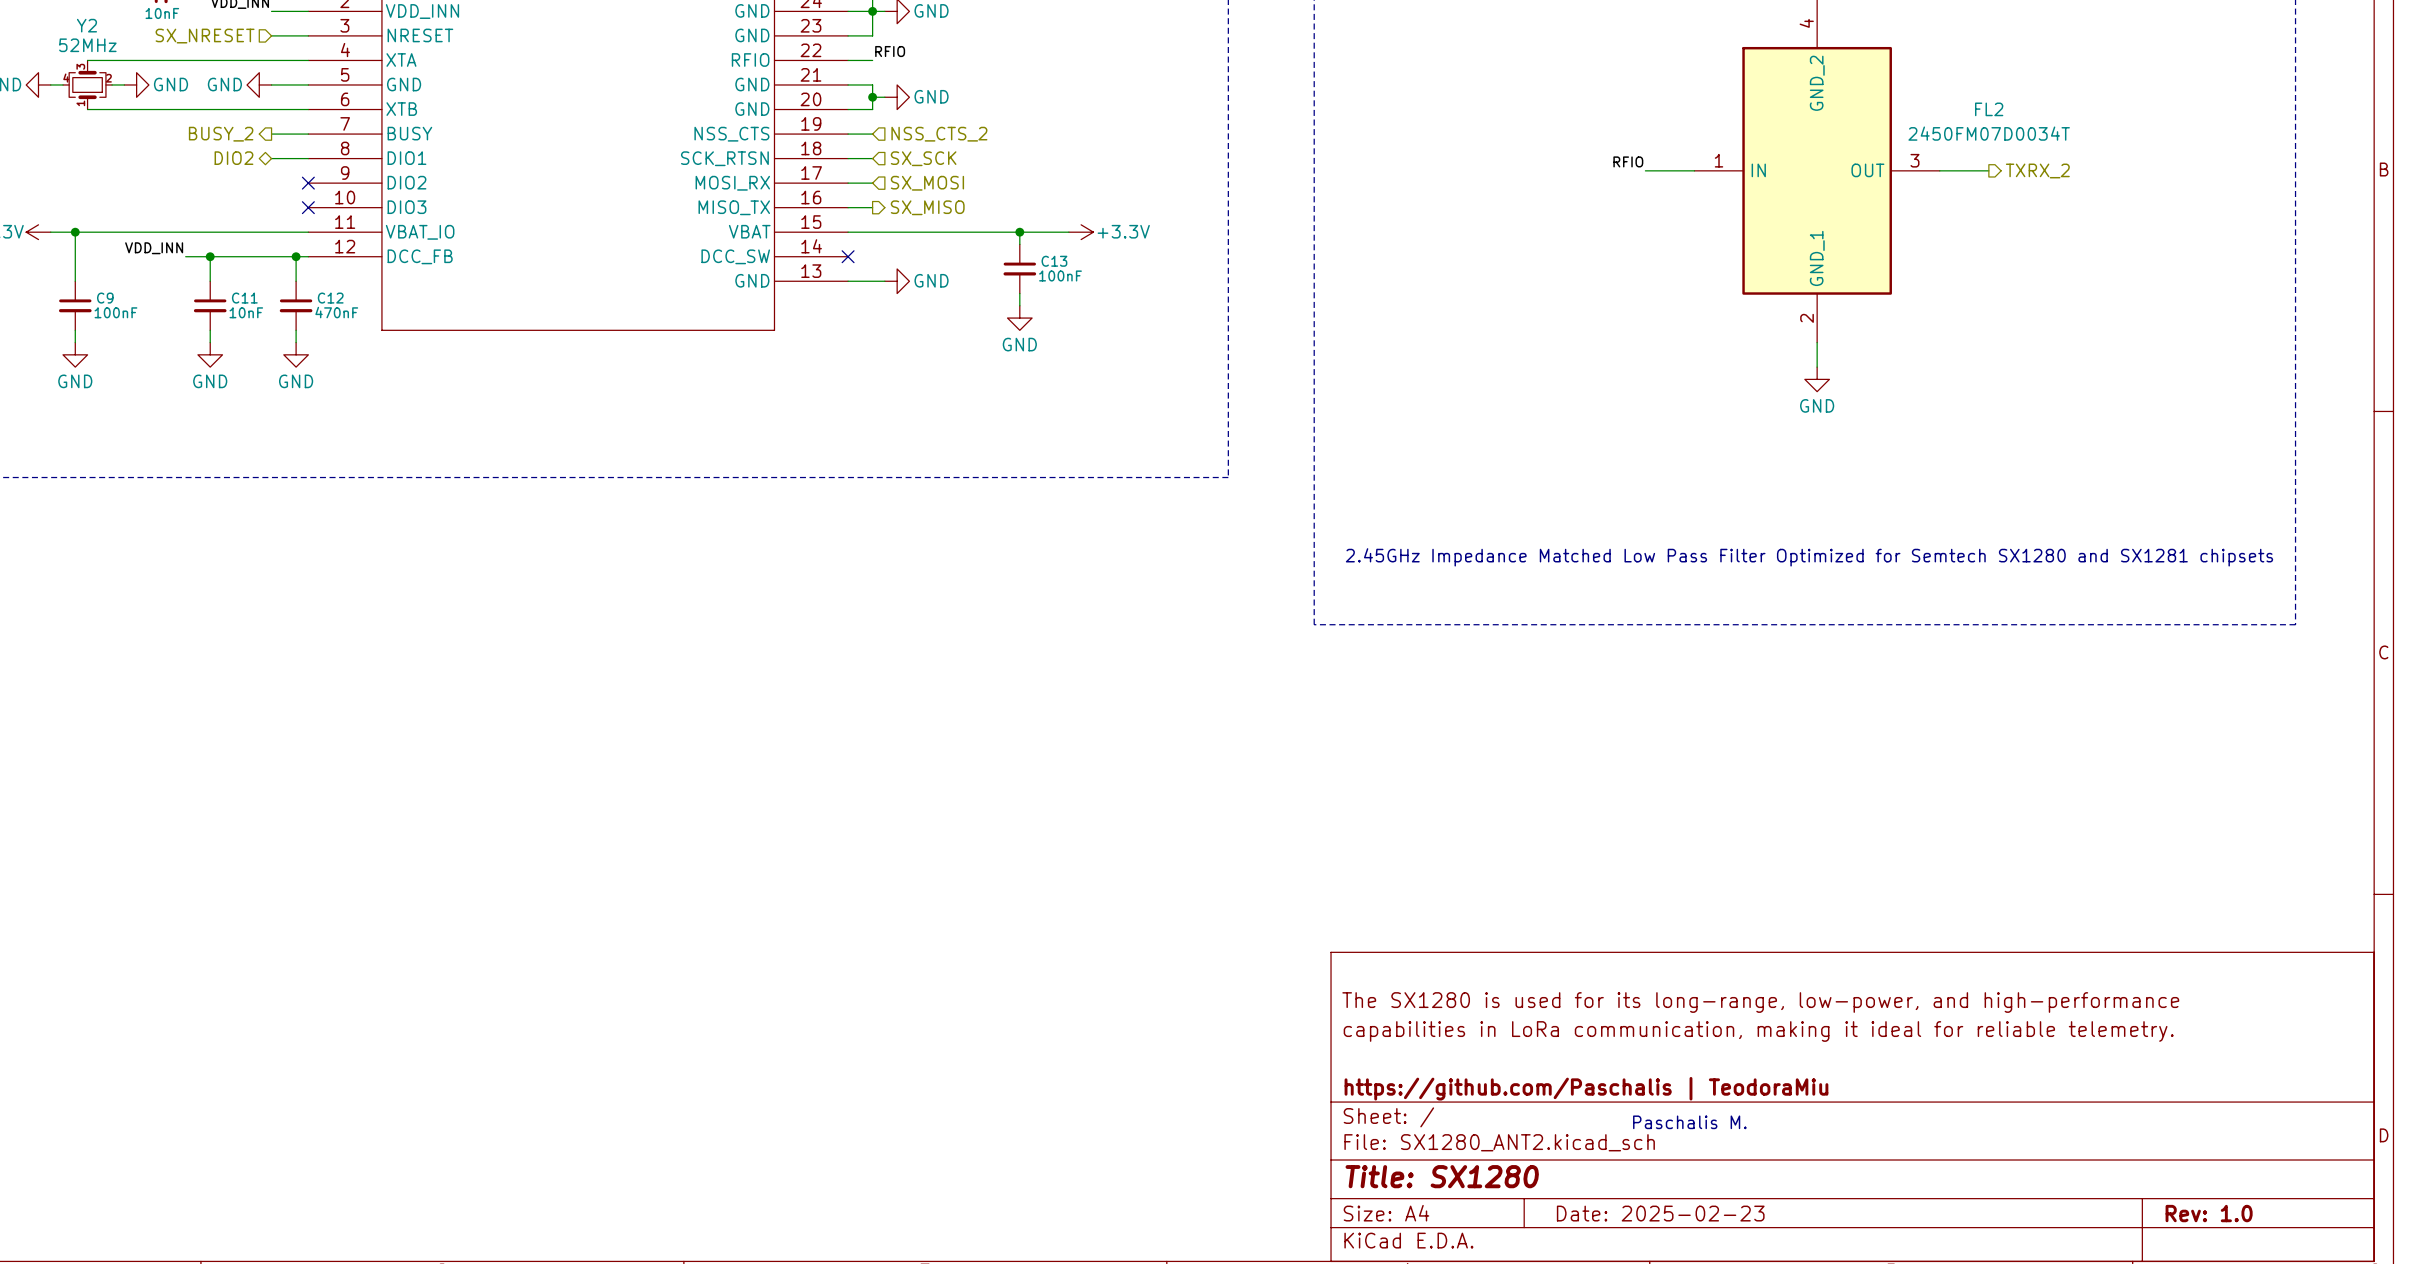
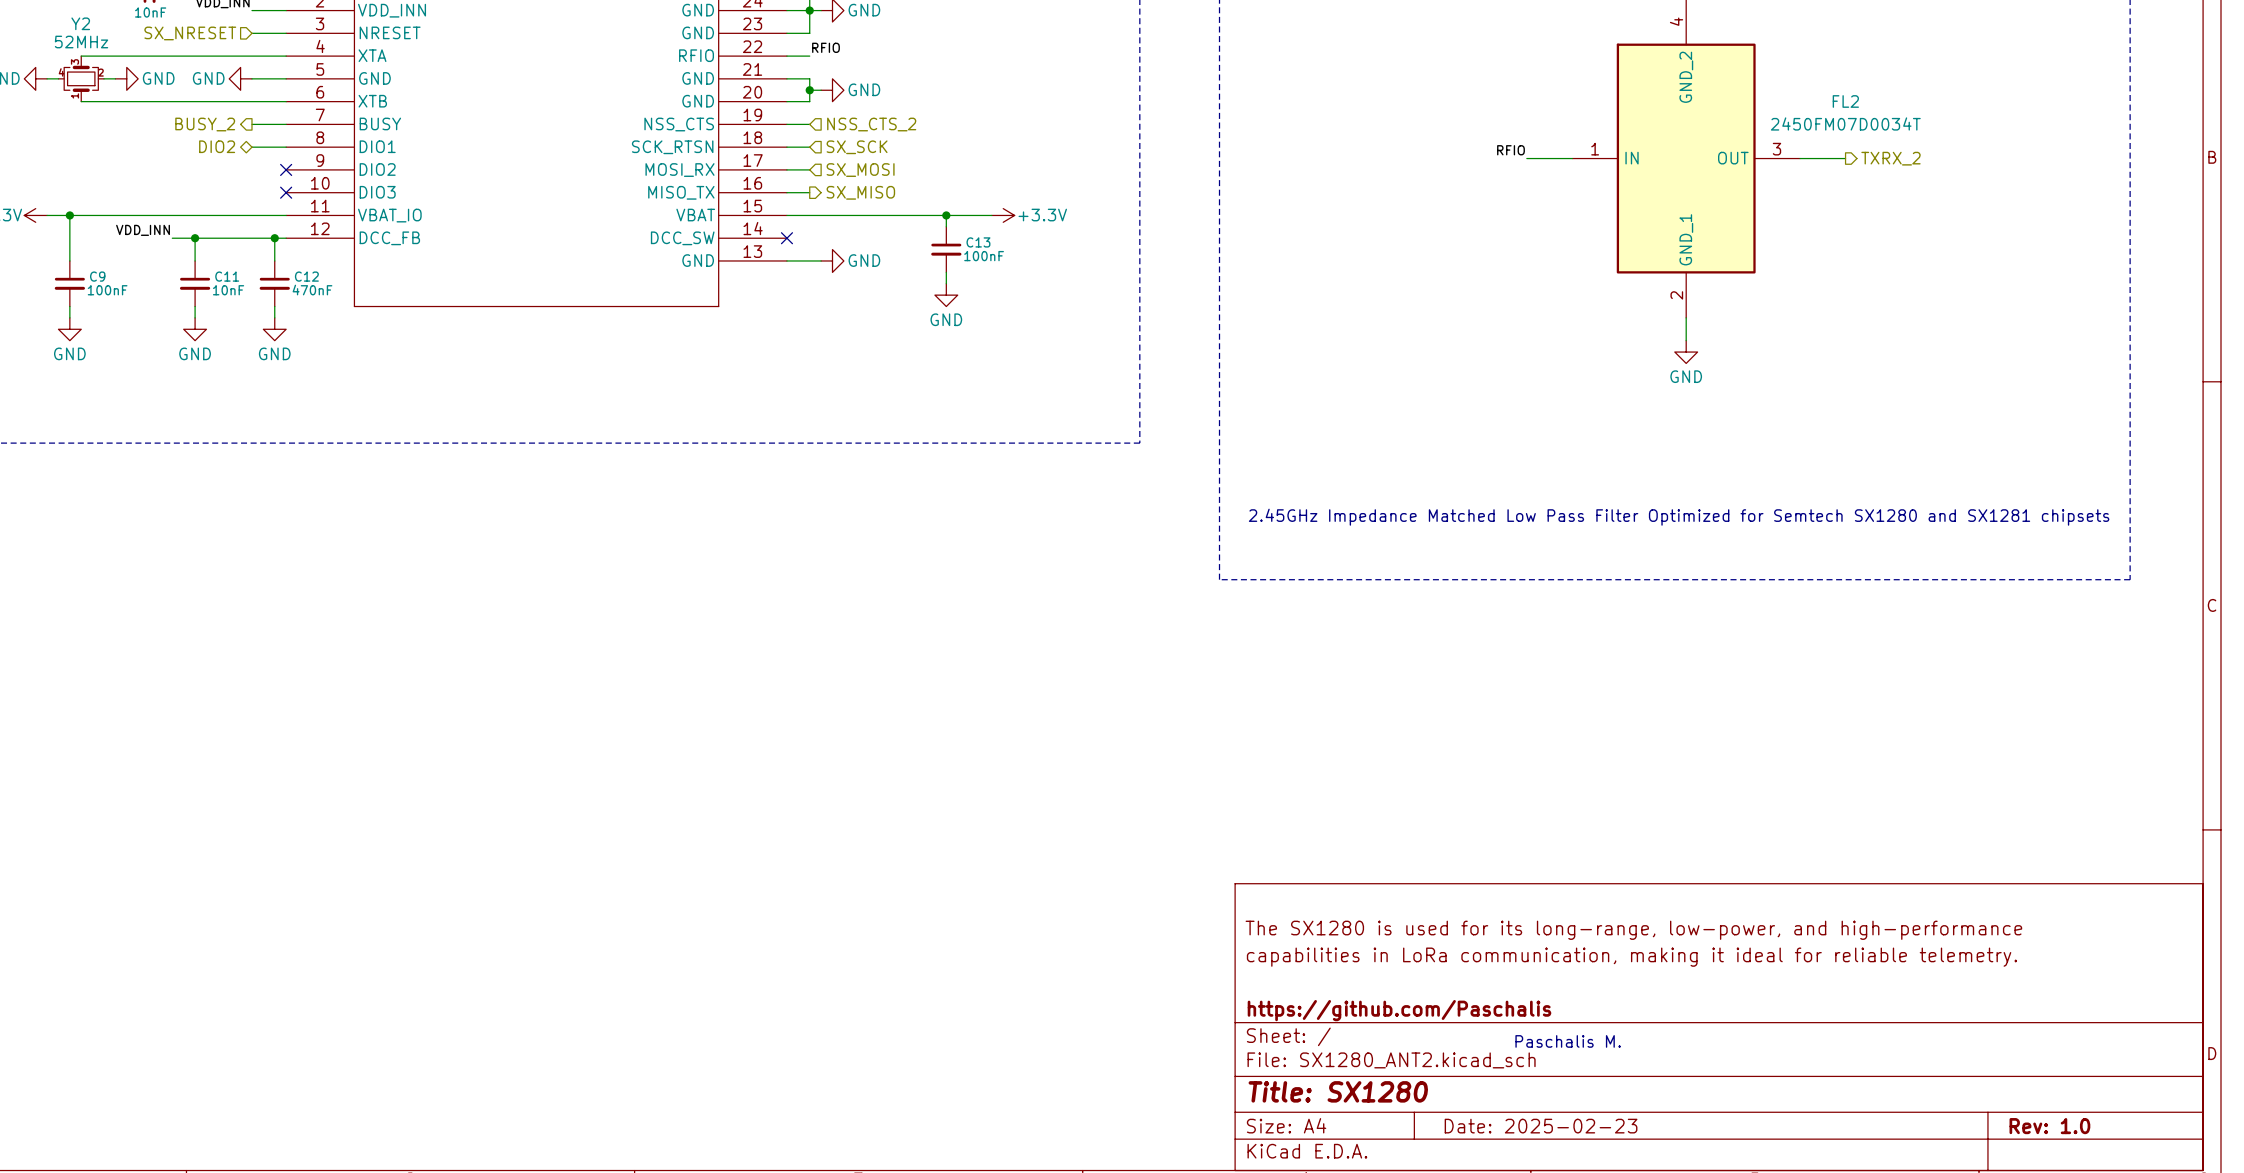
title block: https://github.com/Paschalis | TeodoraMiu (1586, 1088) -> https://github.com/Paschalis (1399, 1010)

